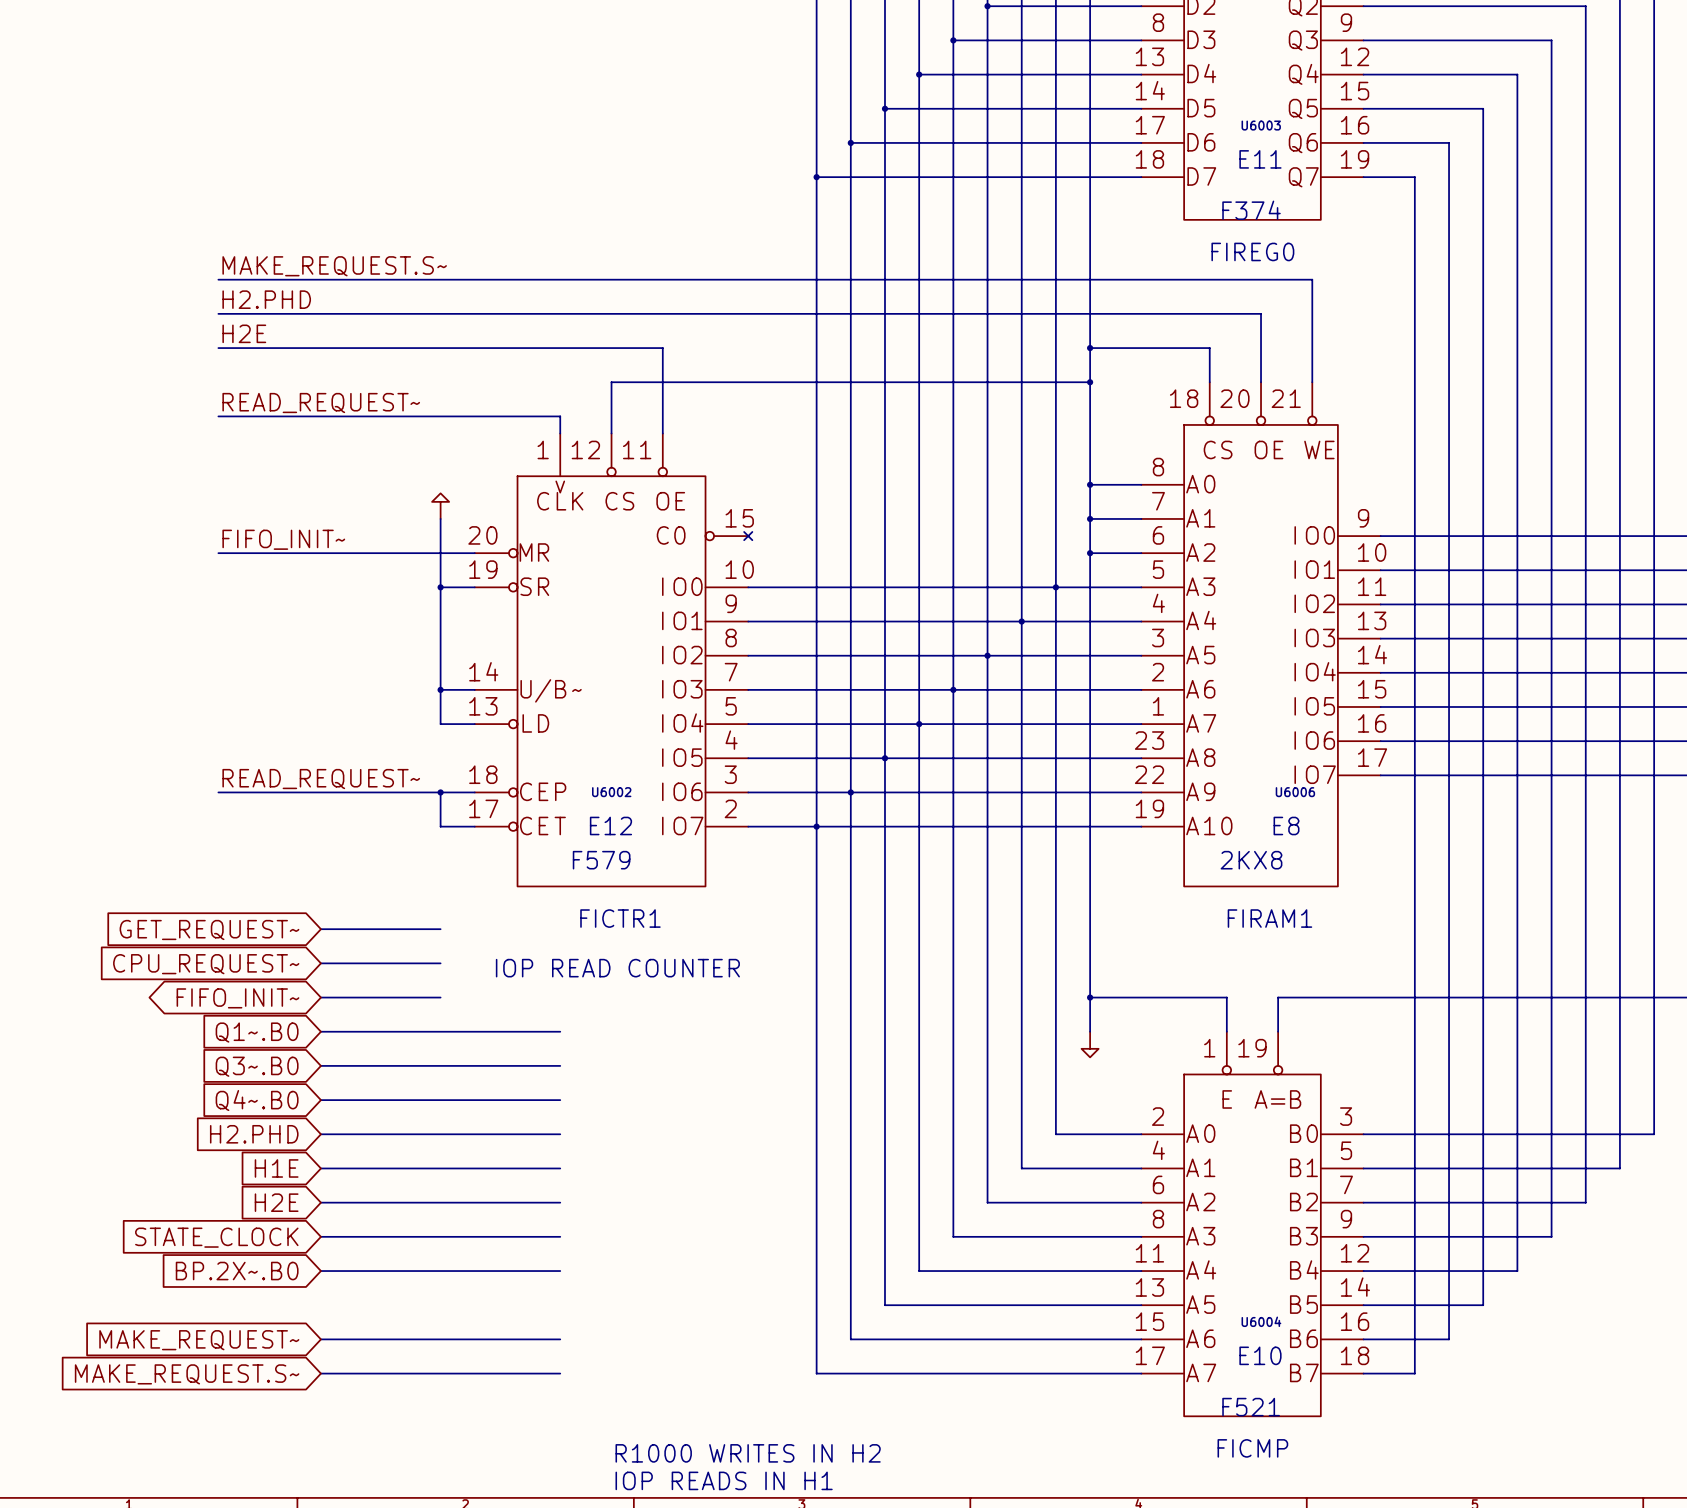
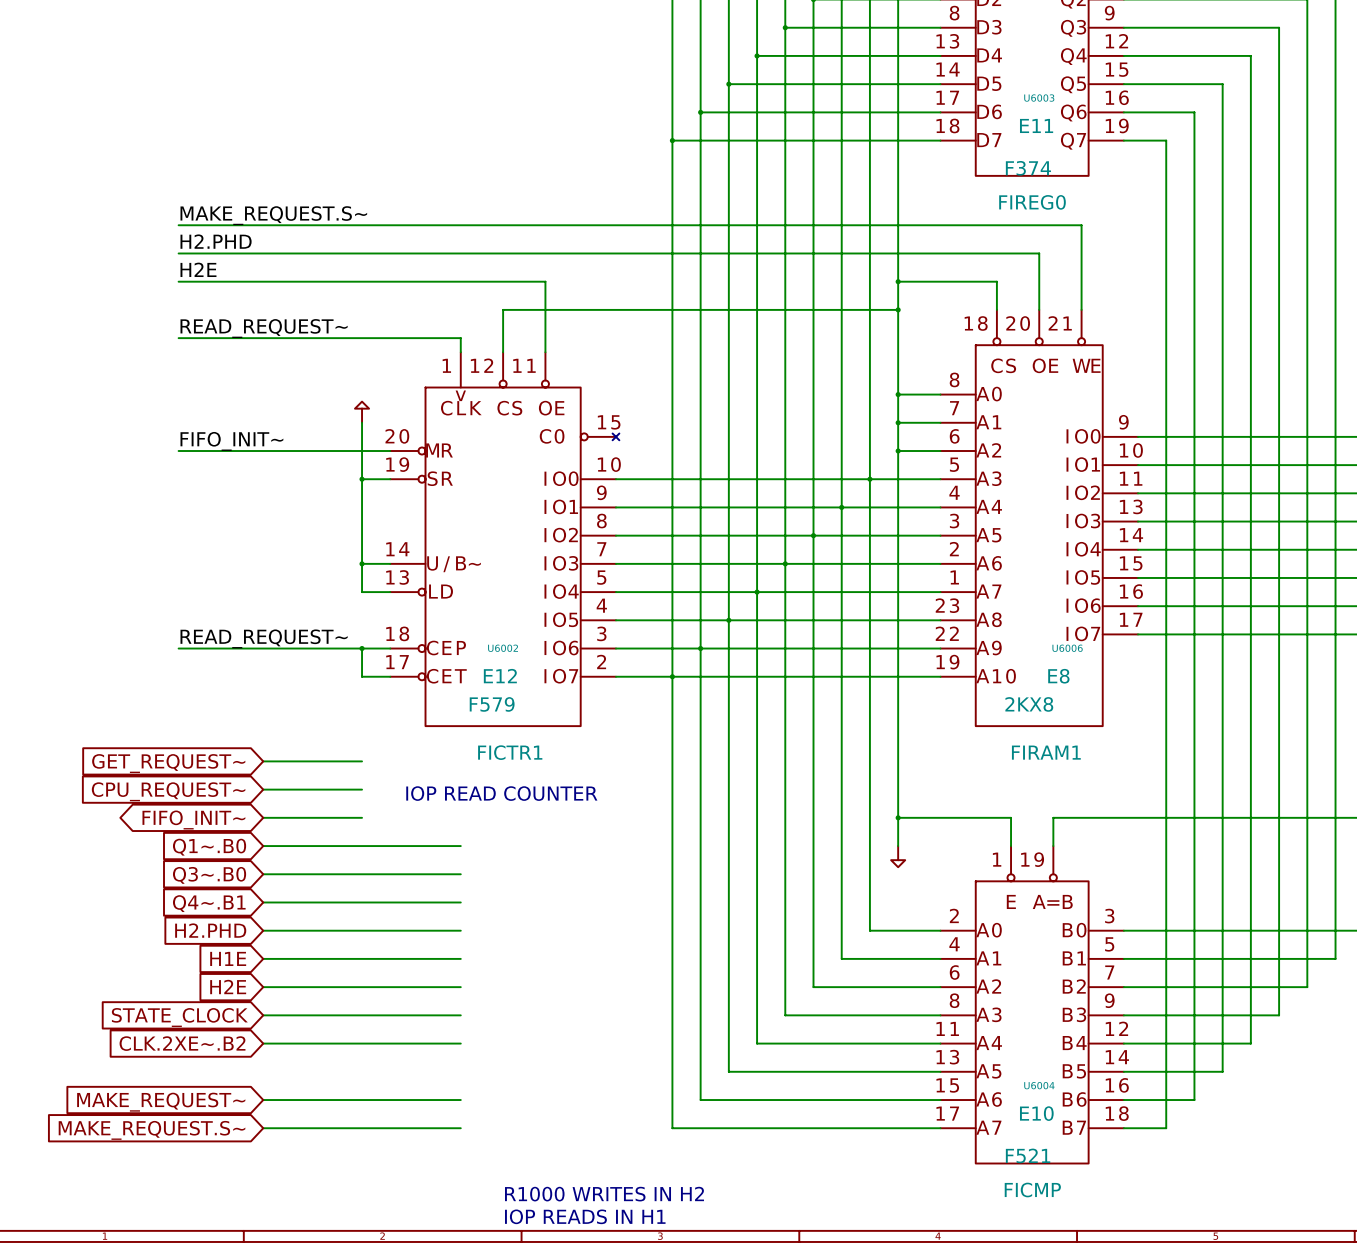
global label: Q4~.B0 (257, 1100) -> Q4~.B1 (209, 903)
global label: BP.2X~.B0 (237, 1271) -> CLK.2XE~.B2 (182, 1043)

